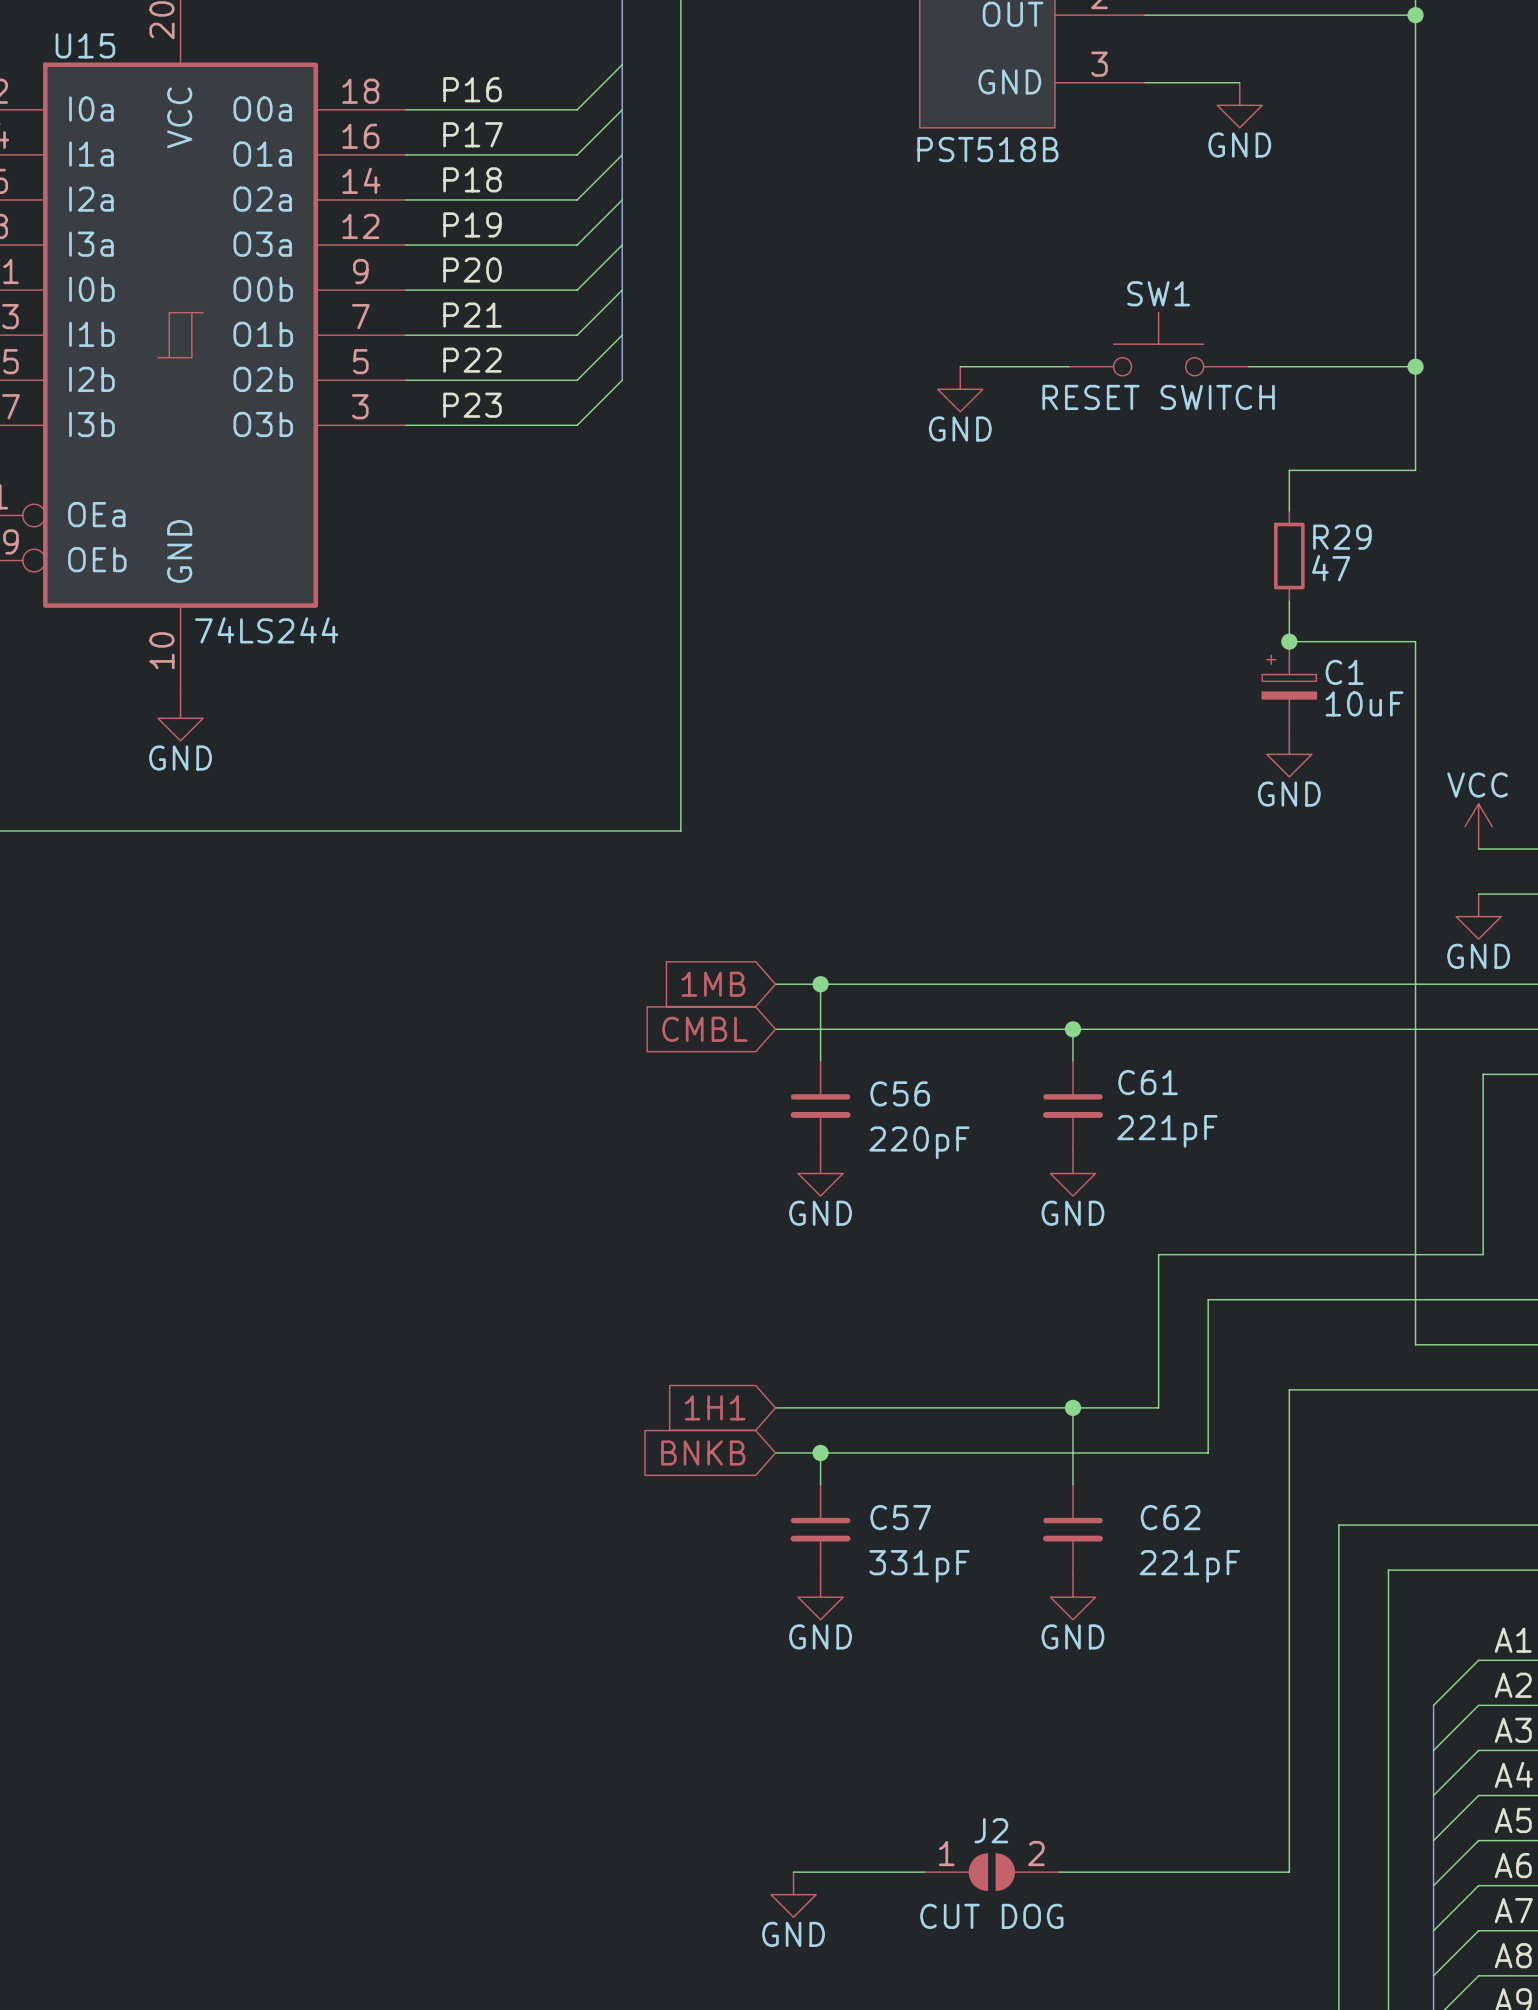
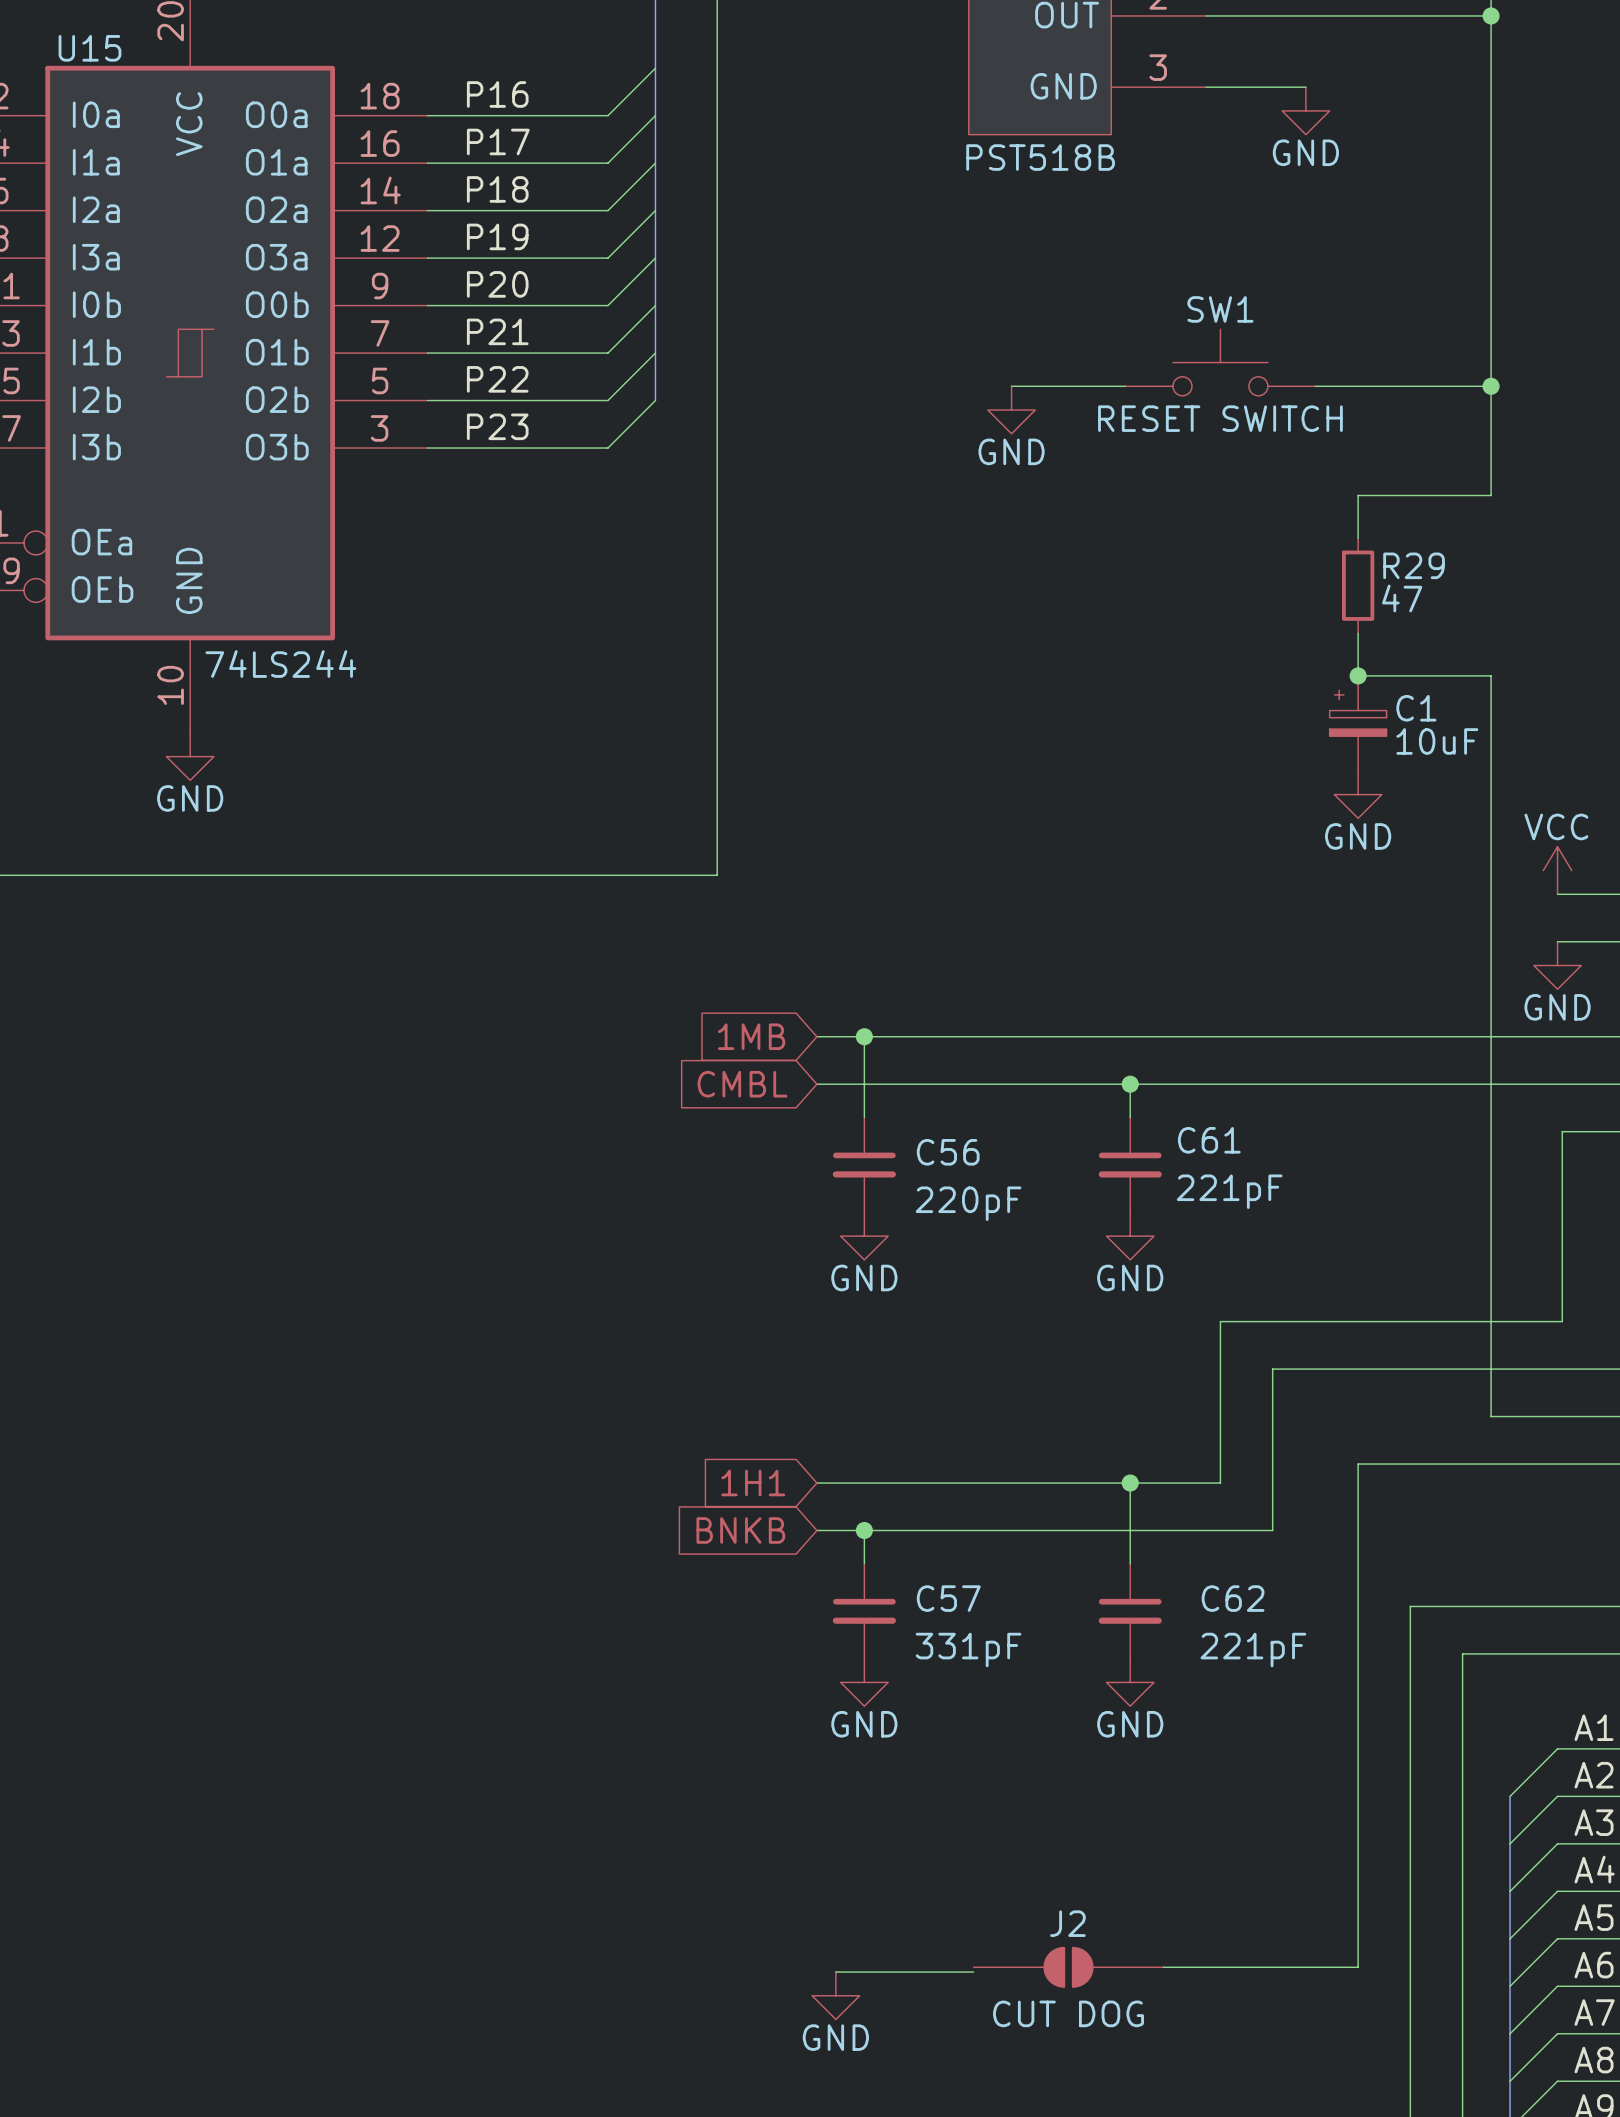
J2 symbol: [924, 1854, 1060, 1891] -> [973, 1946, 1164, 1988]
wire: (1289, 1867) (1289, 1872) (1059, 1872) -> (1358, 1967) (1163, 1967)

